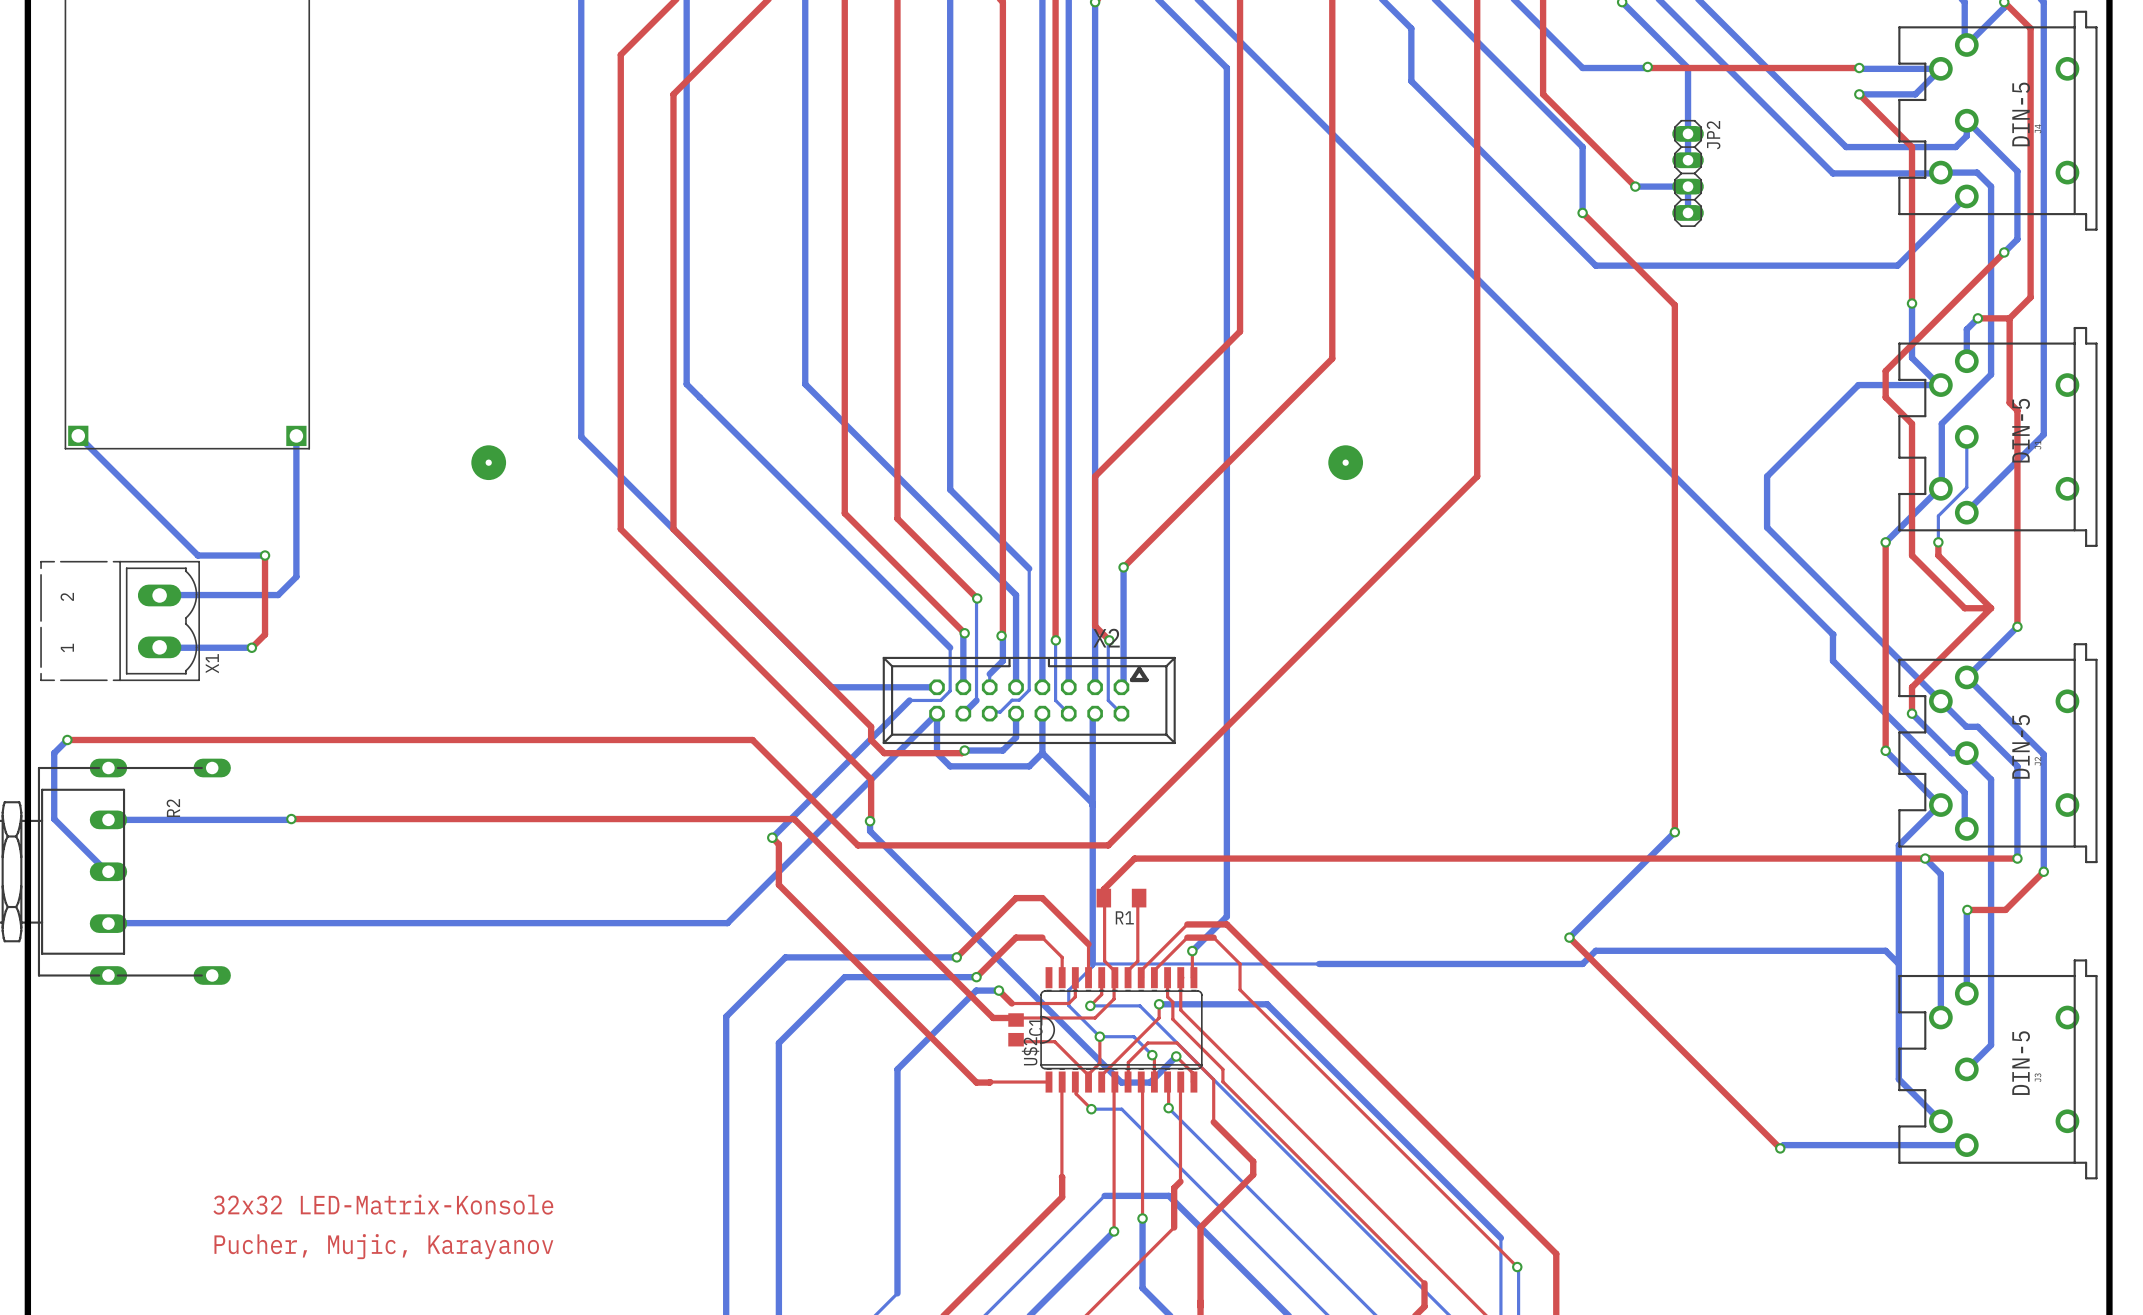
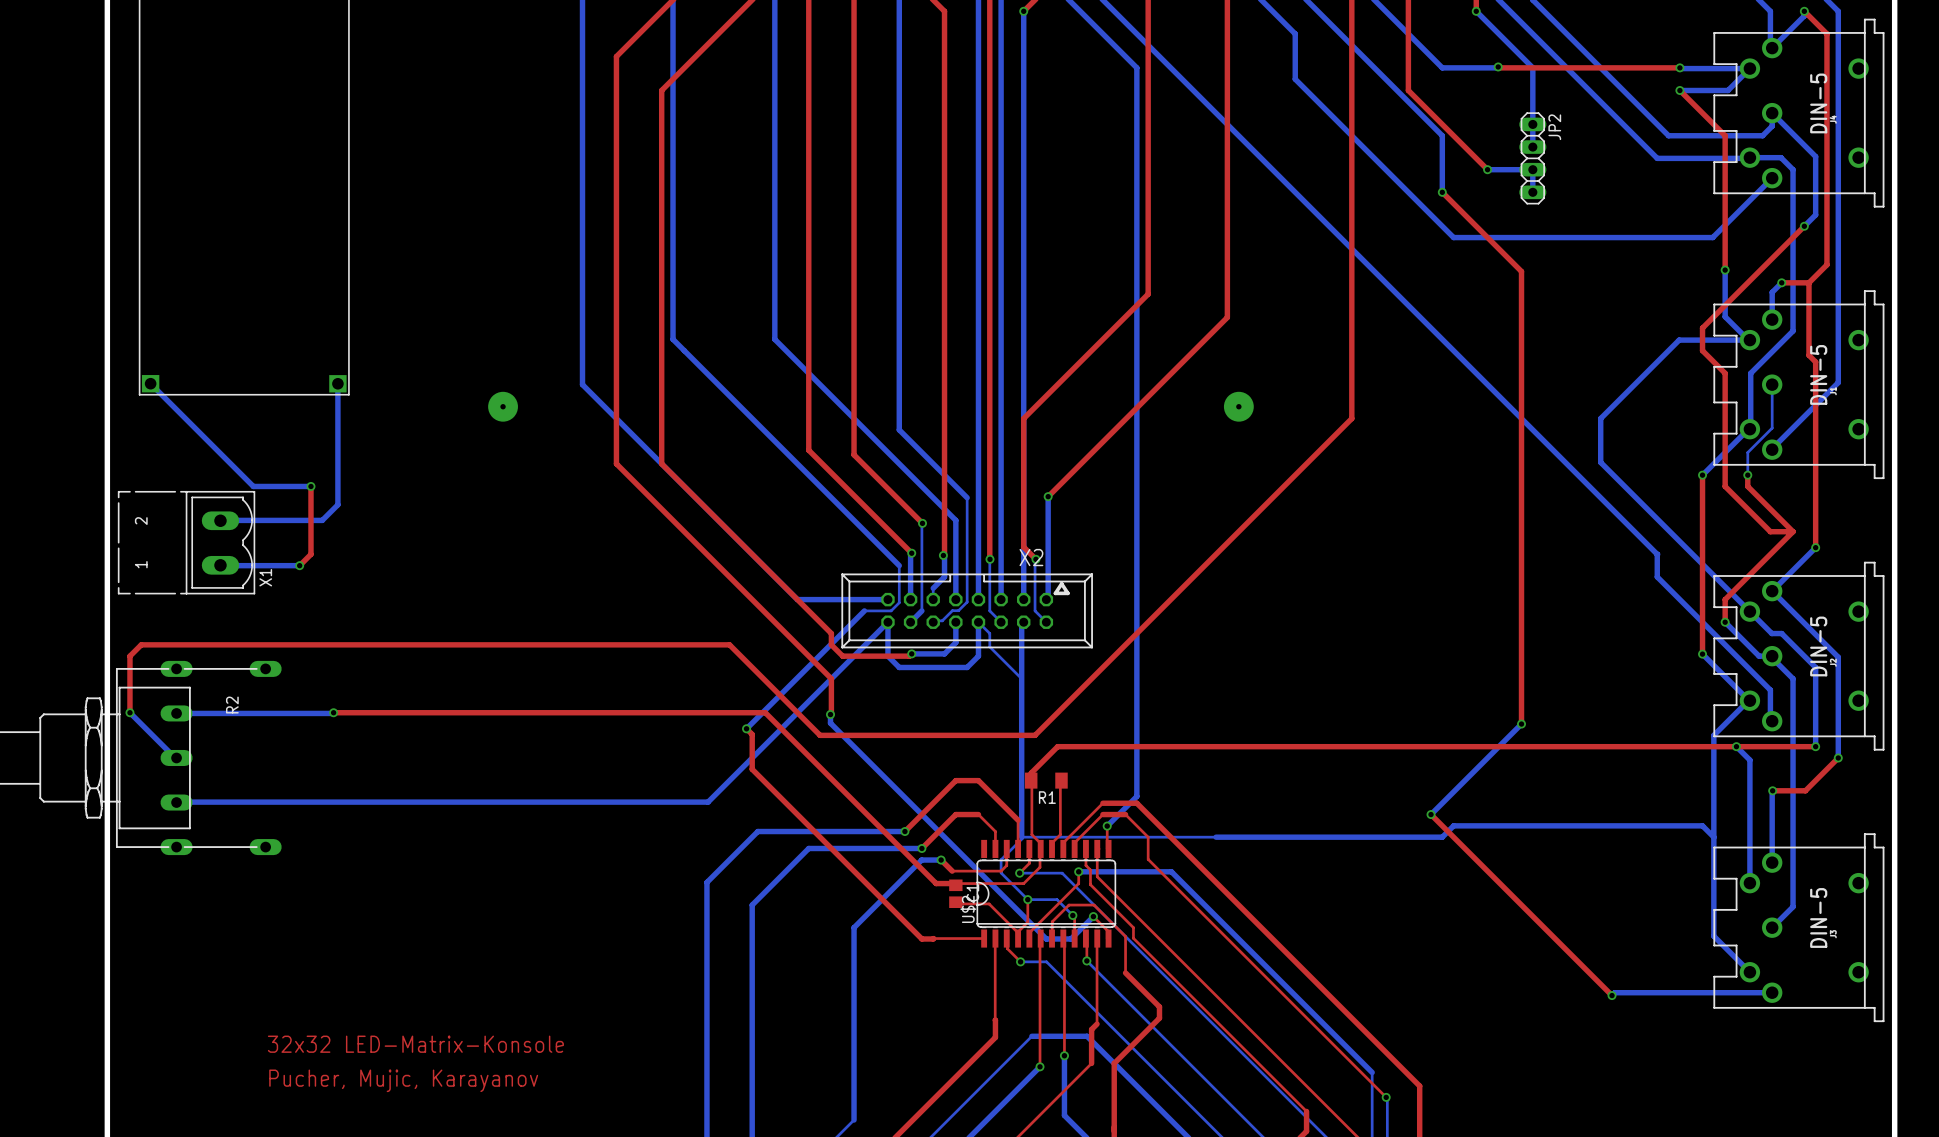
bottom track: none -> (978, 622) (989, 633) (989, 646) (1021, 678)
top track: none -> (141, 644) (129, 656) (129, 712)
bottom track: (67, 739) (54, 753) (54, 819) -> none
via: (67, 739) -> none
bottom track: (1042, 753) (1092, 803) -> none
via: none -> (129, 712)

